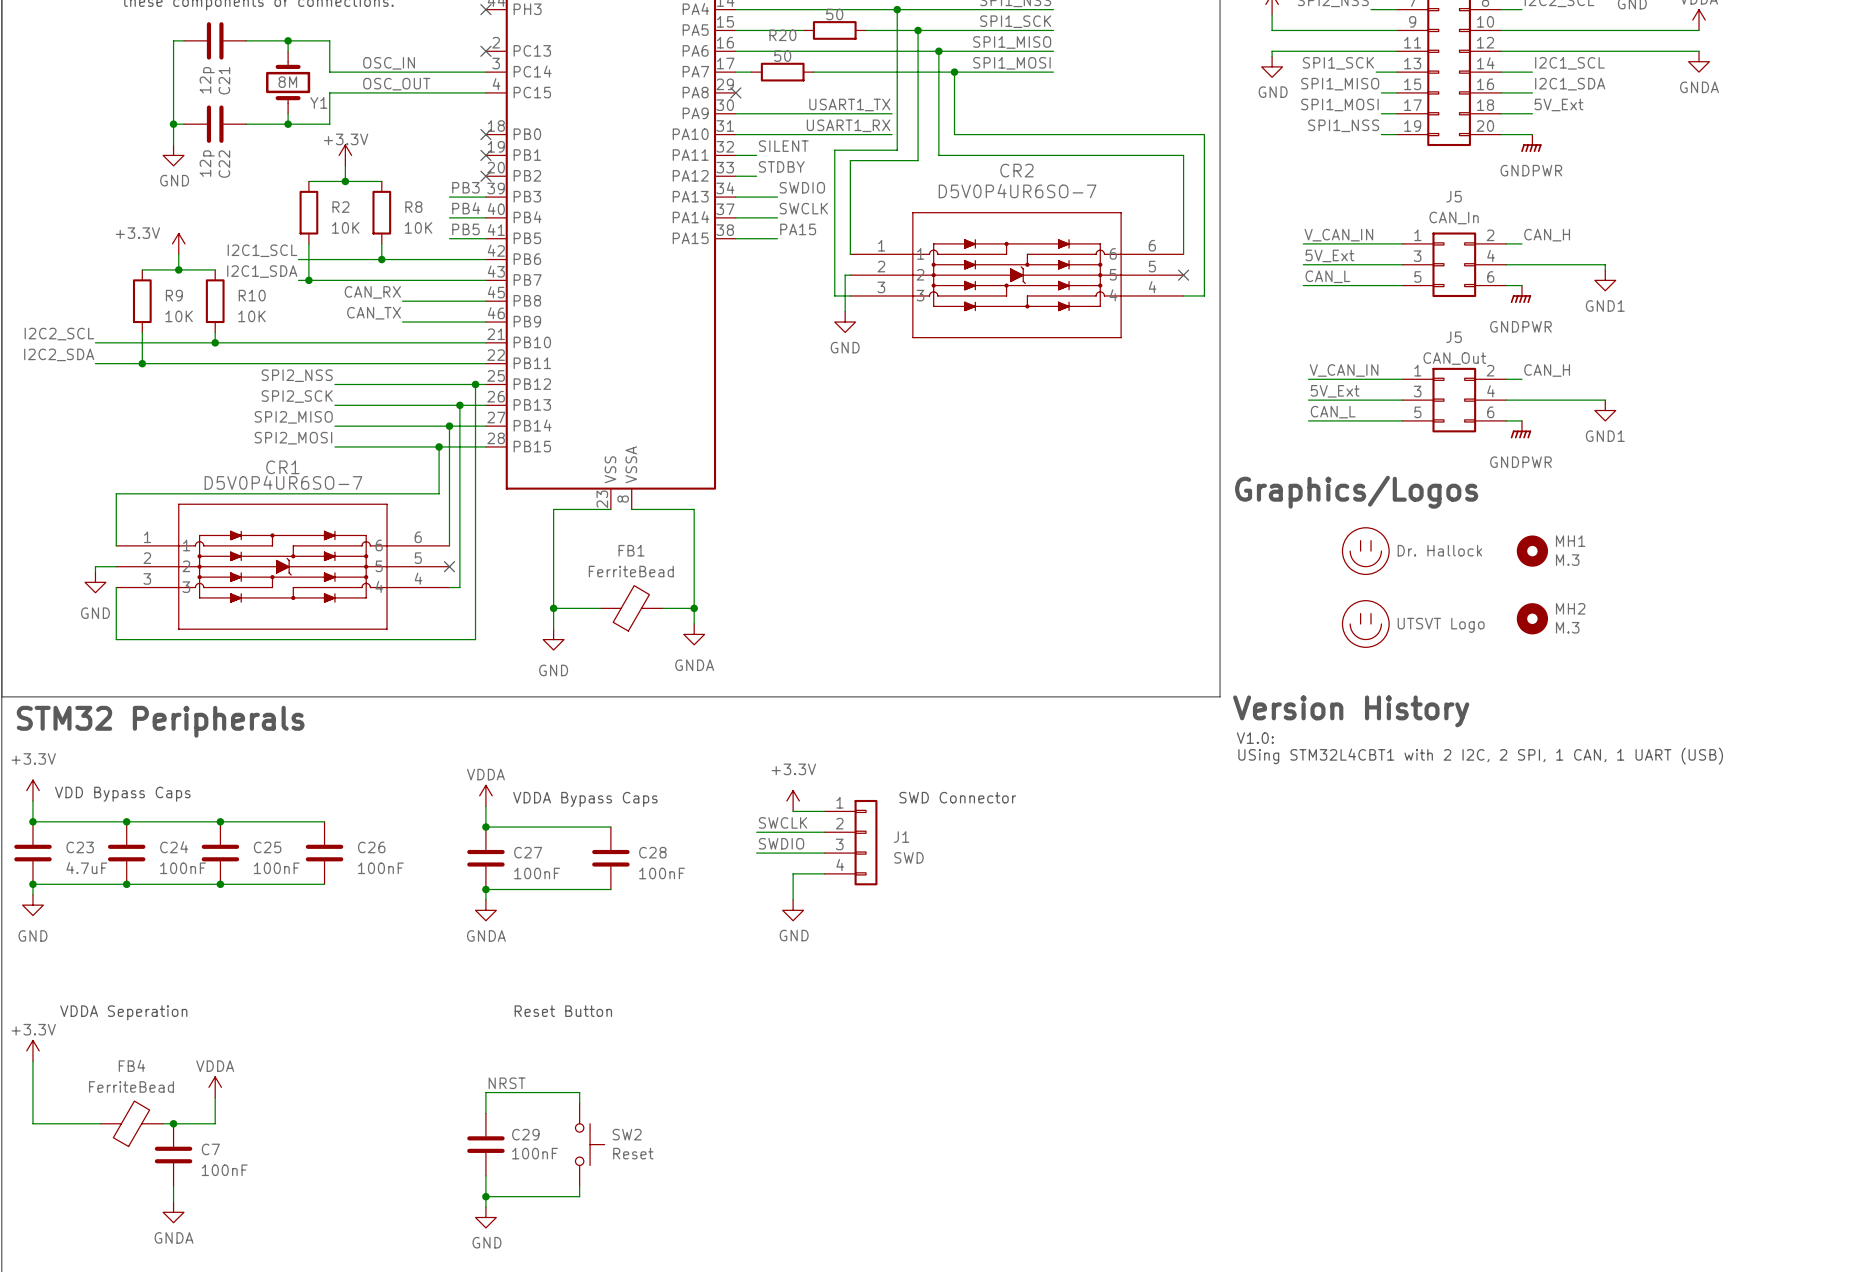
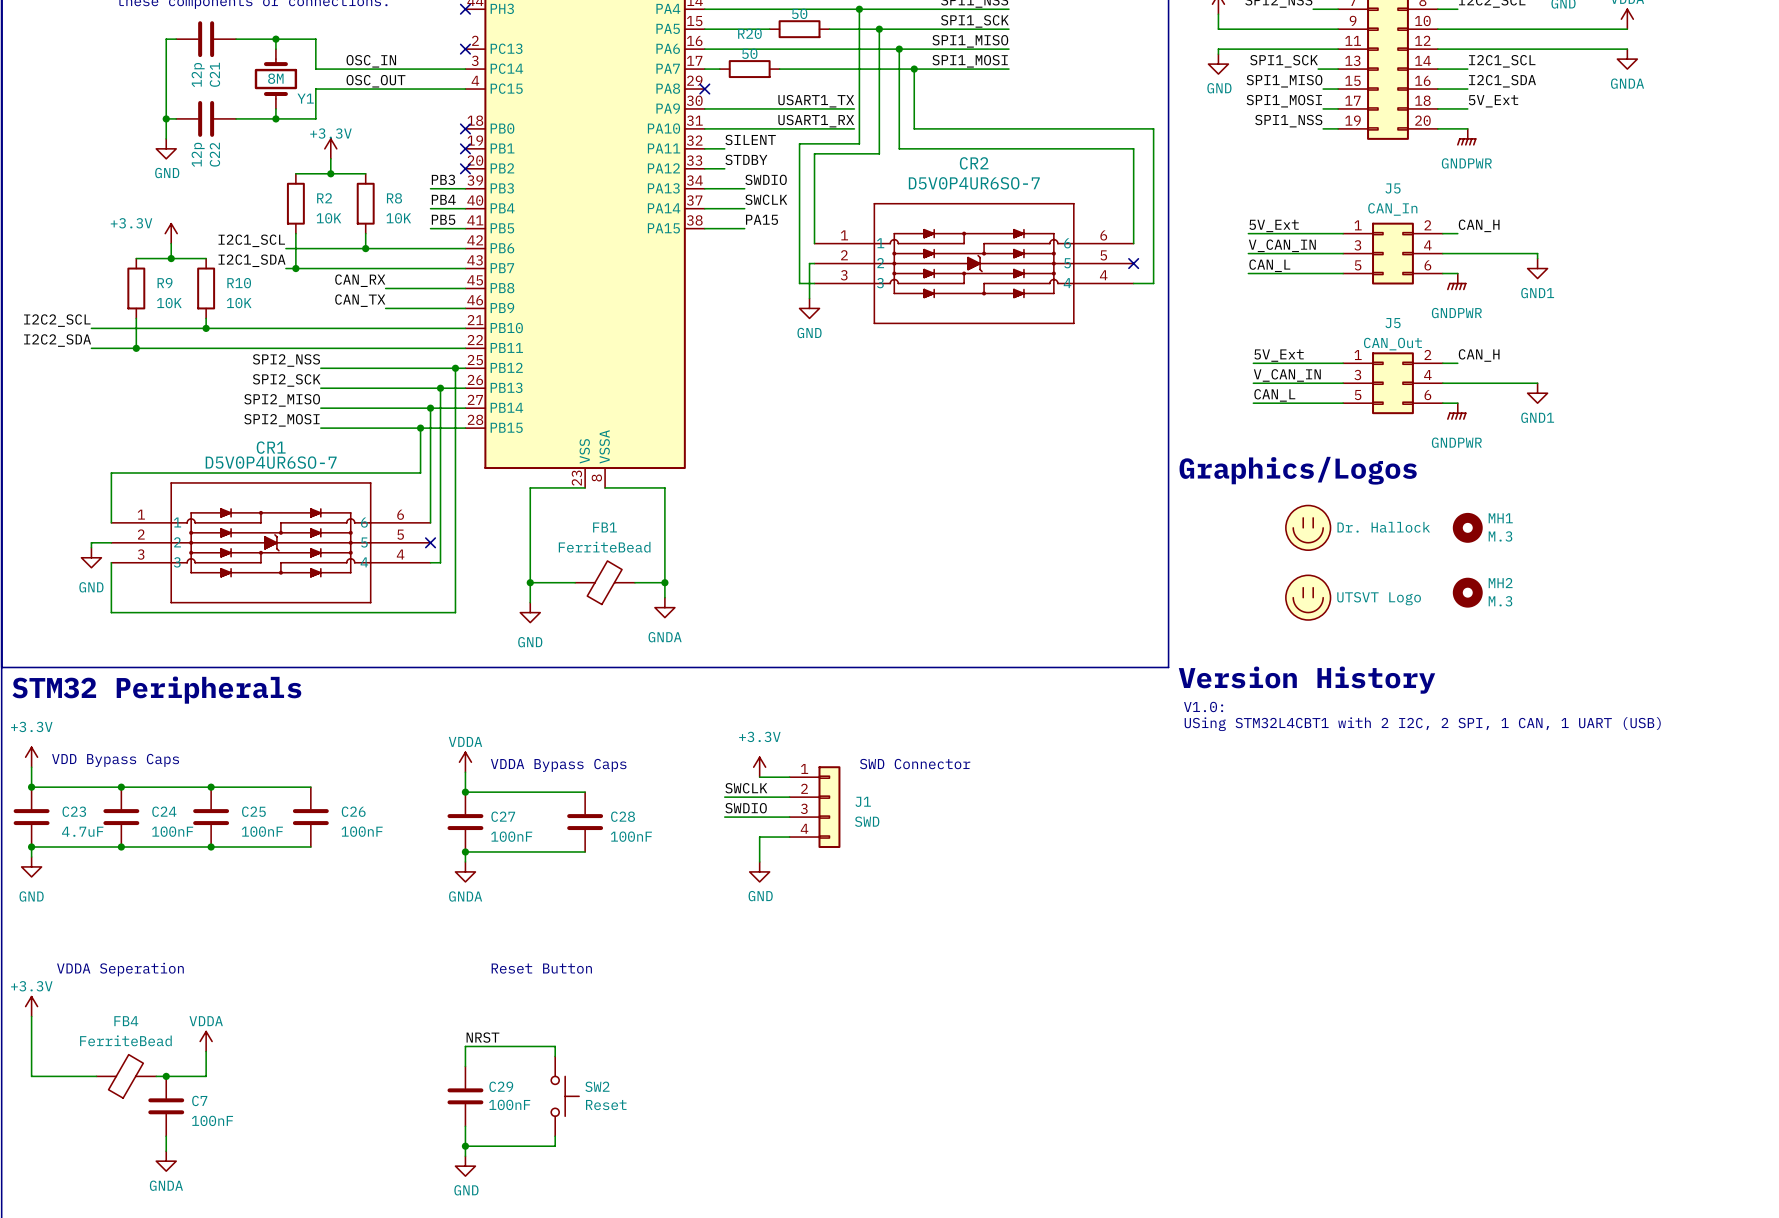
label: V_CAN_IN (1338, 235) -> 5V_Ext (1274, 225)
label: 5V_Ext (1329, 255) -> V_CAN_IN (1282, 245)
label: V_CAN_IN (1344, 370) -> 5V_Ext (1279, 355)
label: 5V_Ext (1335, 391) -> V_CAN_IN (1287, 375)

